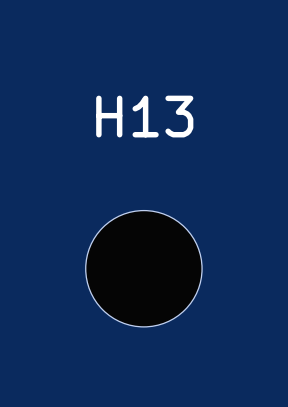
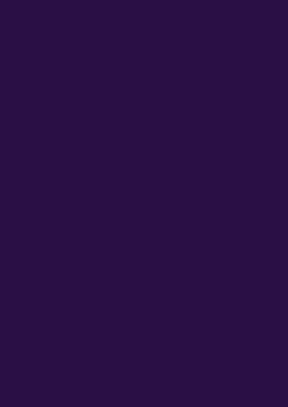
H13: (143, 268) -> none

